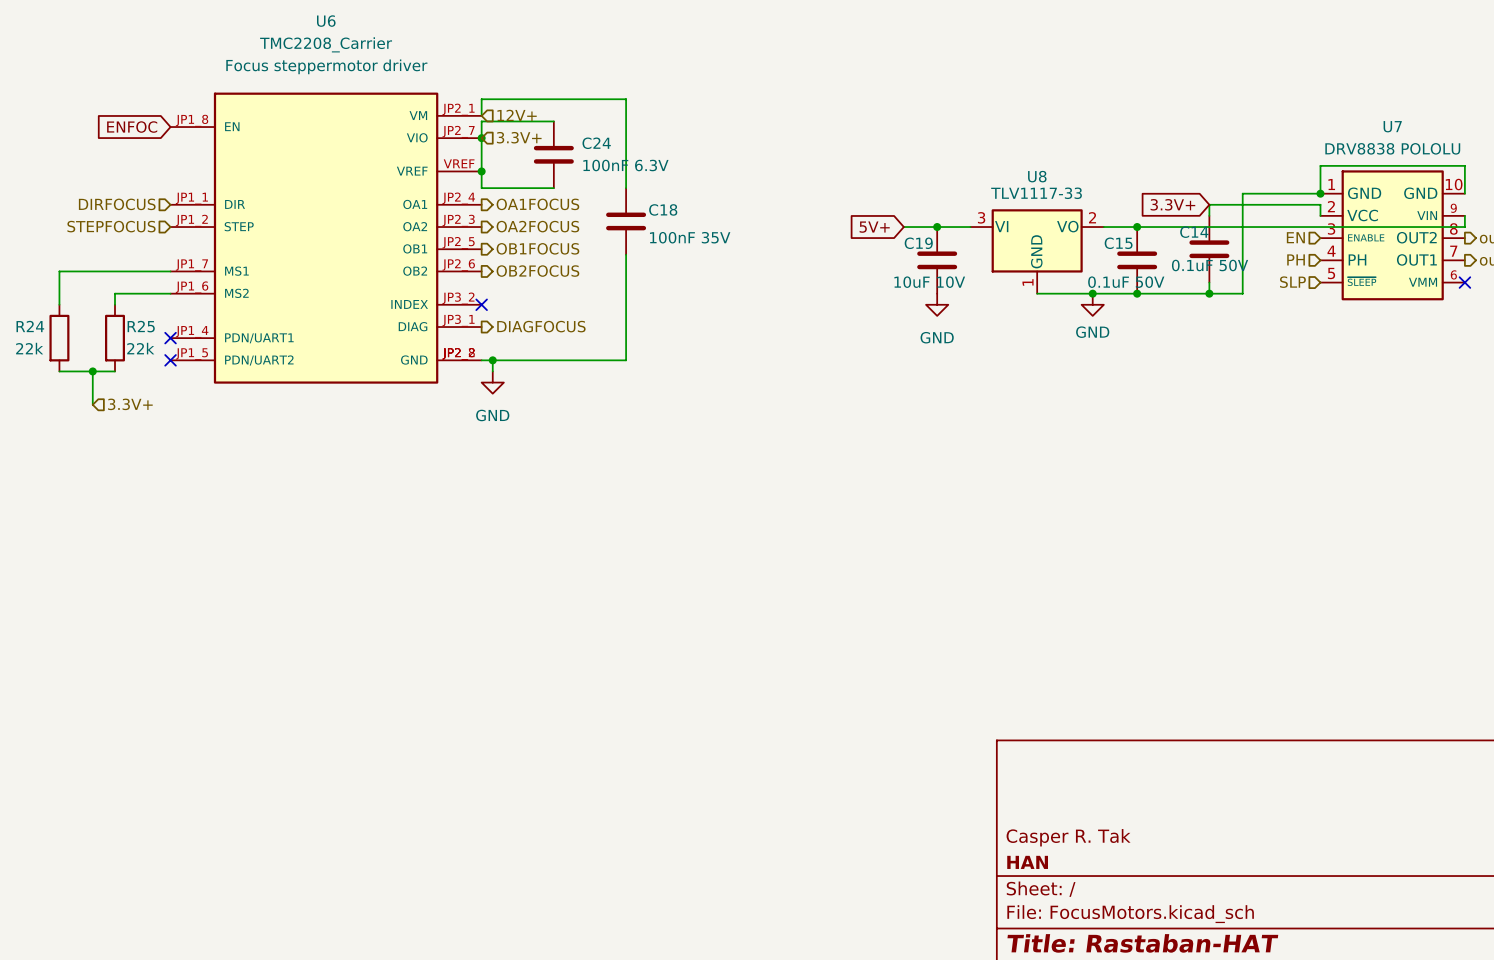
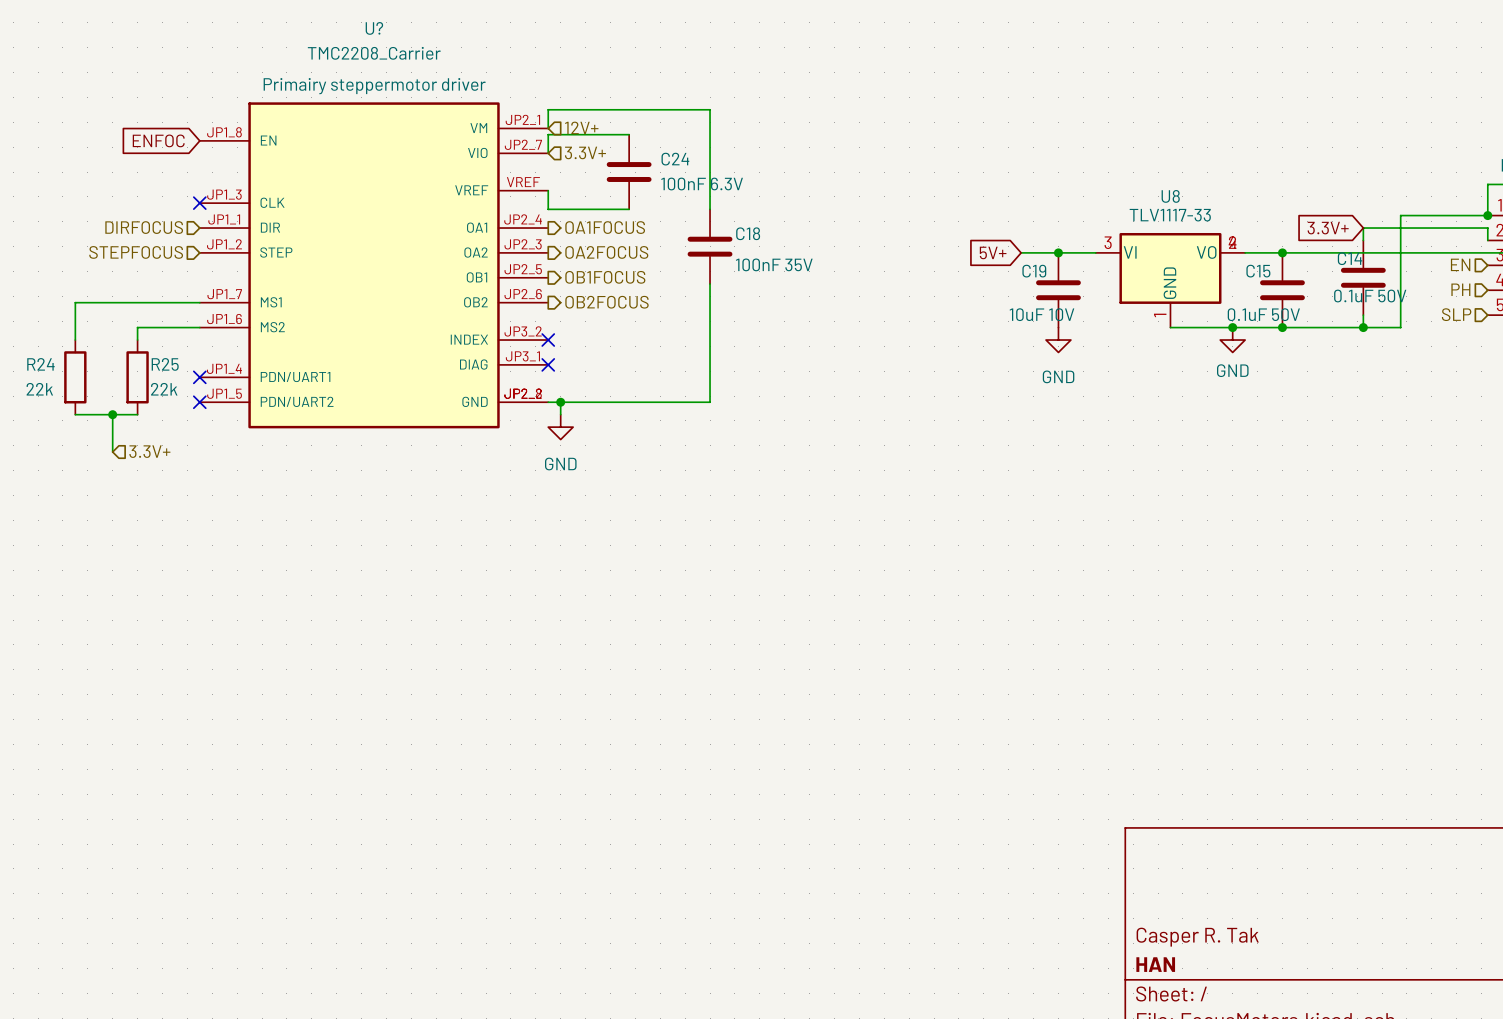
wire: (481, 138) (481, 171) -> none
junction: (481, 138) -> none
junction: (481, 171) -> none
no-connect mark: none -> (199, 203)
U8 symbol: [970, 209, 1104, 294] -> [1095, 232, 1246, 328]
U6: TMC2208_Carrier (326, 238) -> none
U?: none -> TMC2208_Carrier (374, 265)
hierarchical label: DIAGFOCUS (541, 326) -> none
no-connect mark: none -> (548, 364)

